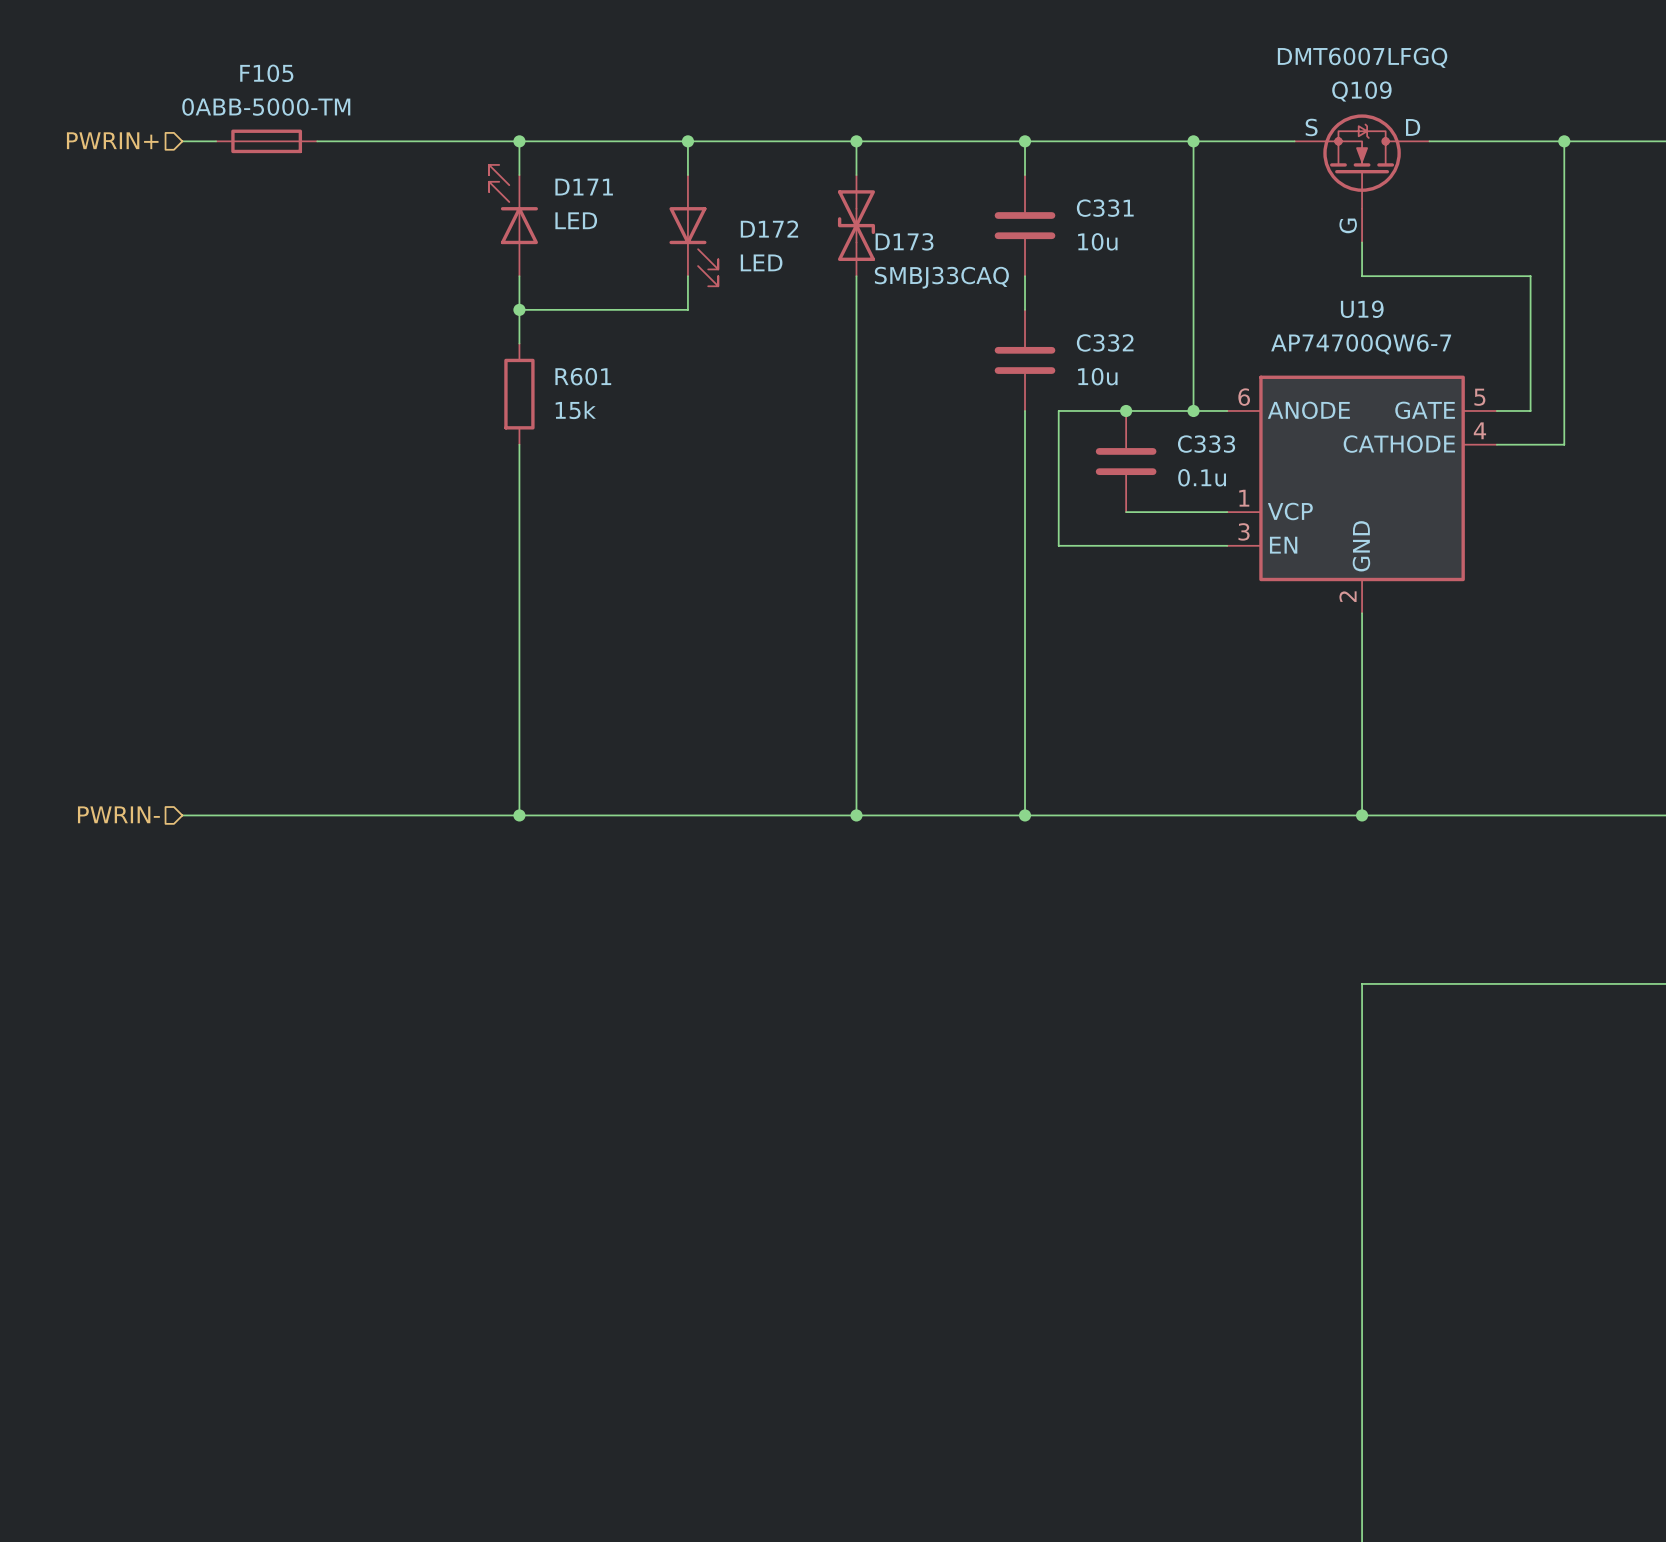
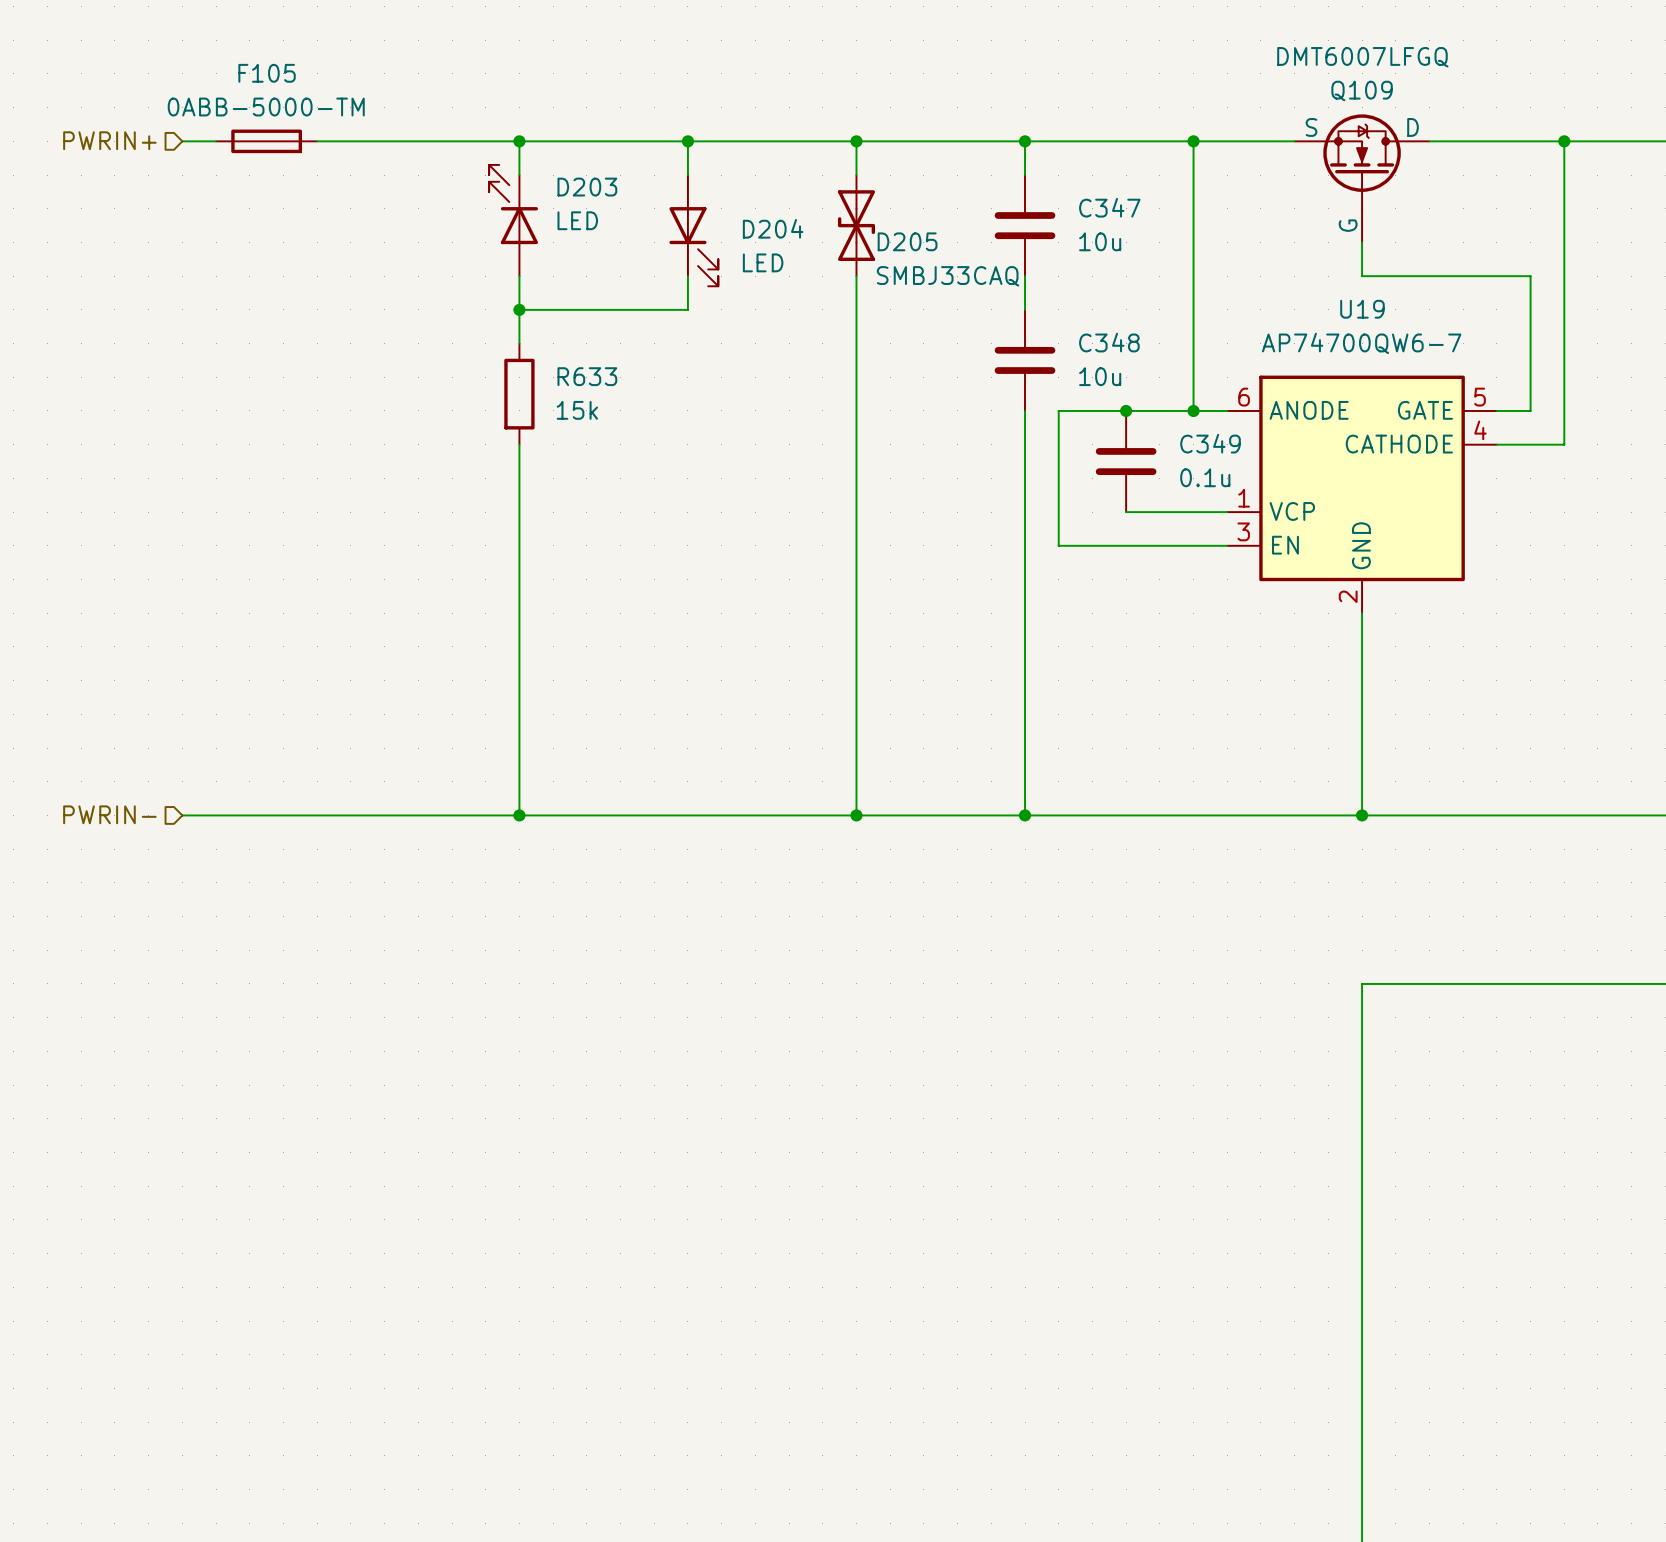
D171 name: D171 (584, 187) -> D203 (587, 187)
C331 name: C331 (1105, 208) -> C347 (1109, 207)
D172 name: D172 (769, 229) -> D204 (773, 228)
D173 name: D173 (904, 241) -> D205 (907, 241)
C332 name: C332 (1105, 342) -> C348 (1109, 342)
R601 name: R601 (583, 376) -> R633 (587, 376)
C333 name: C333 (1206, 444) -> C349 (1210, 443)

